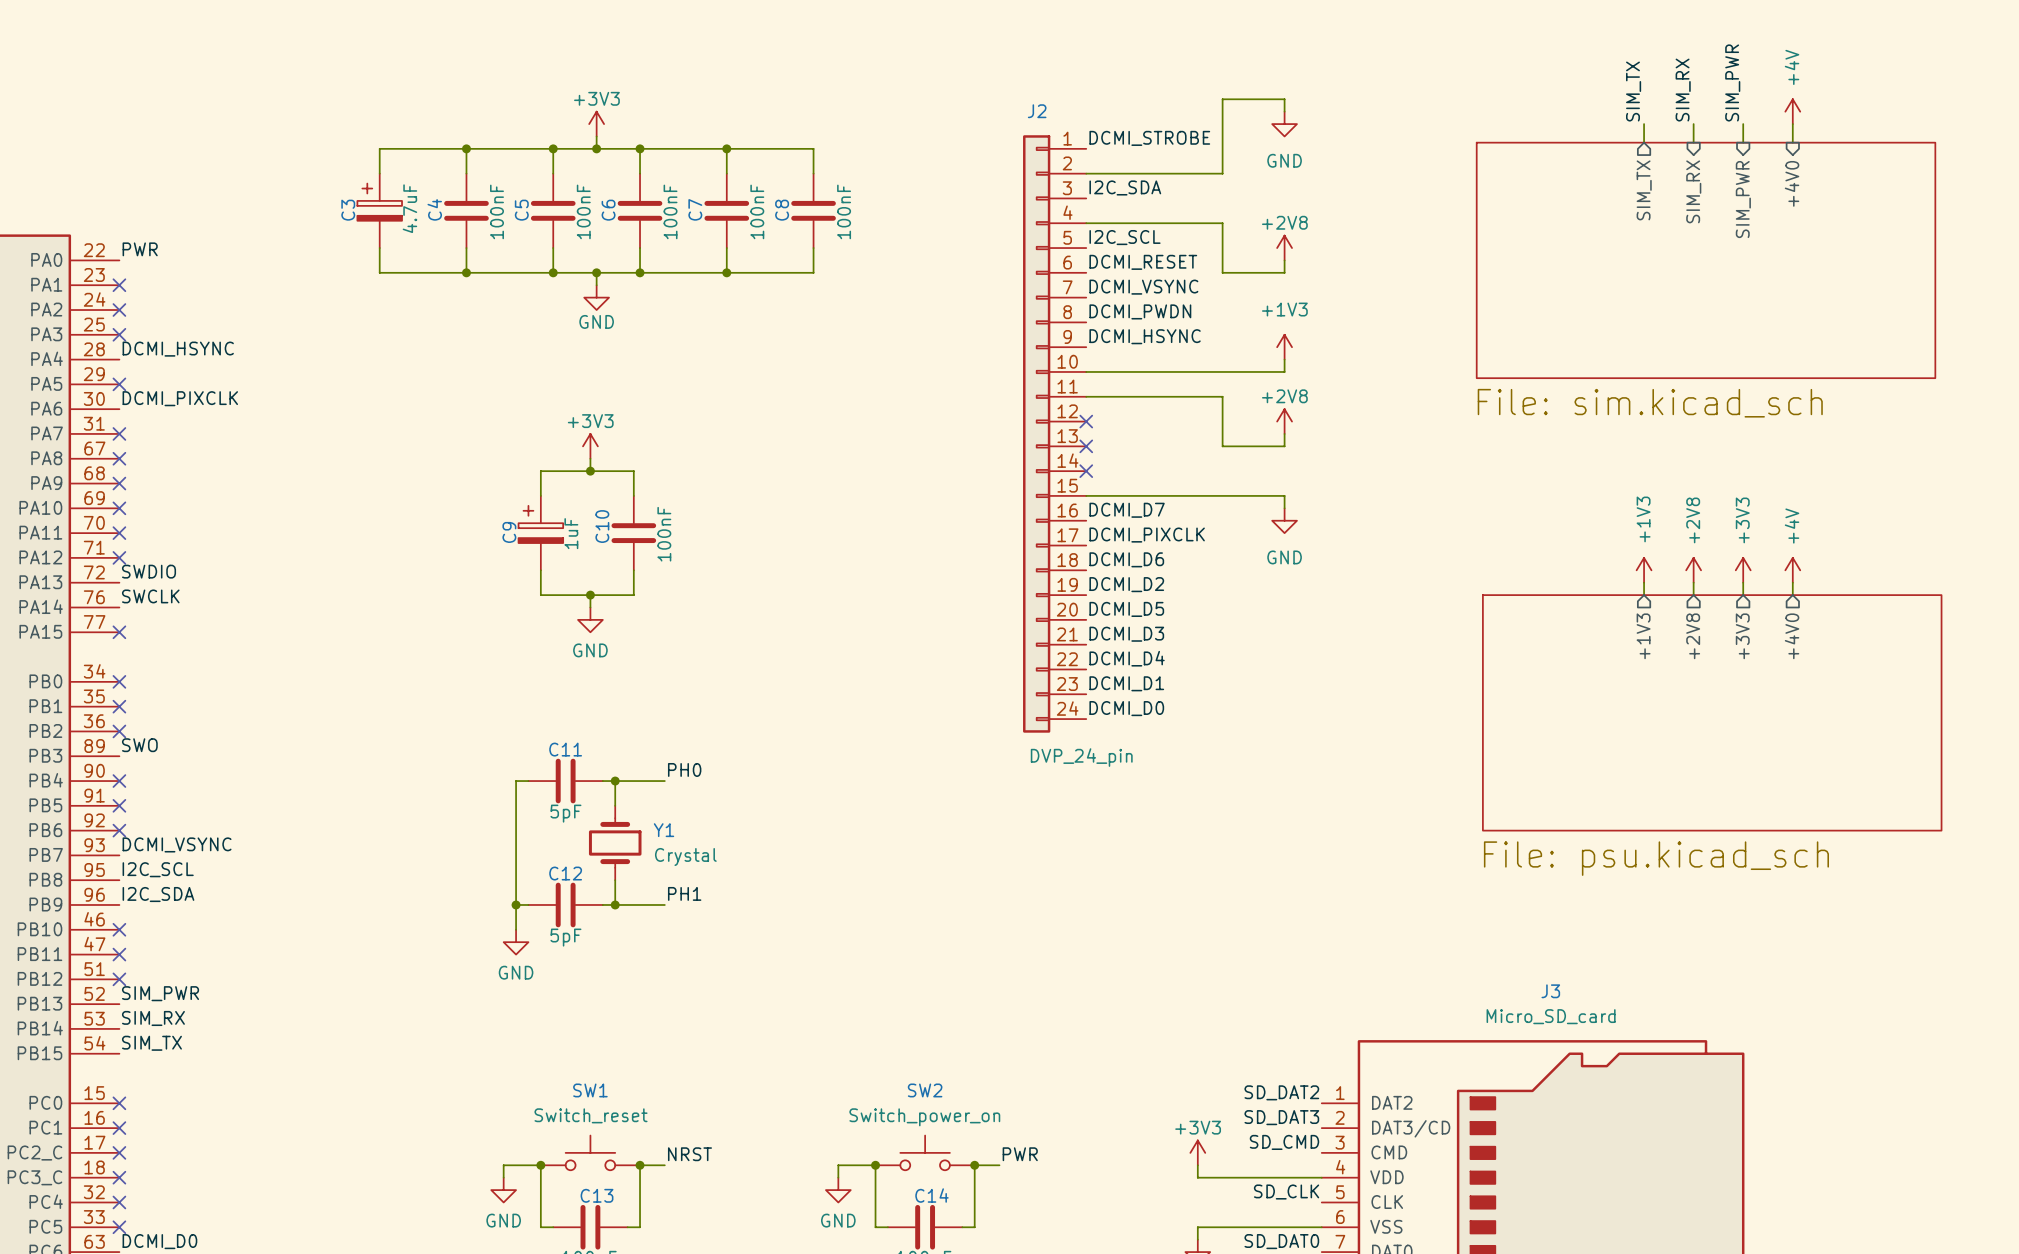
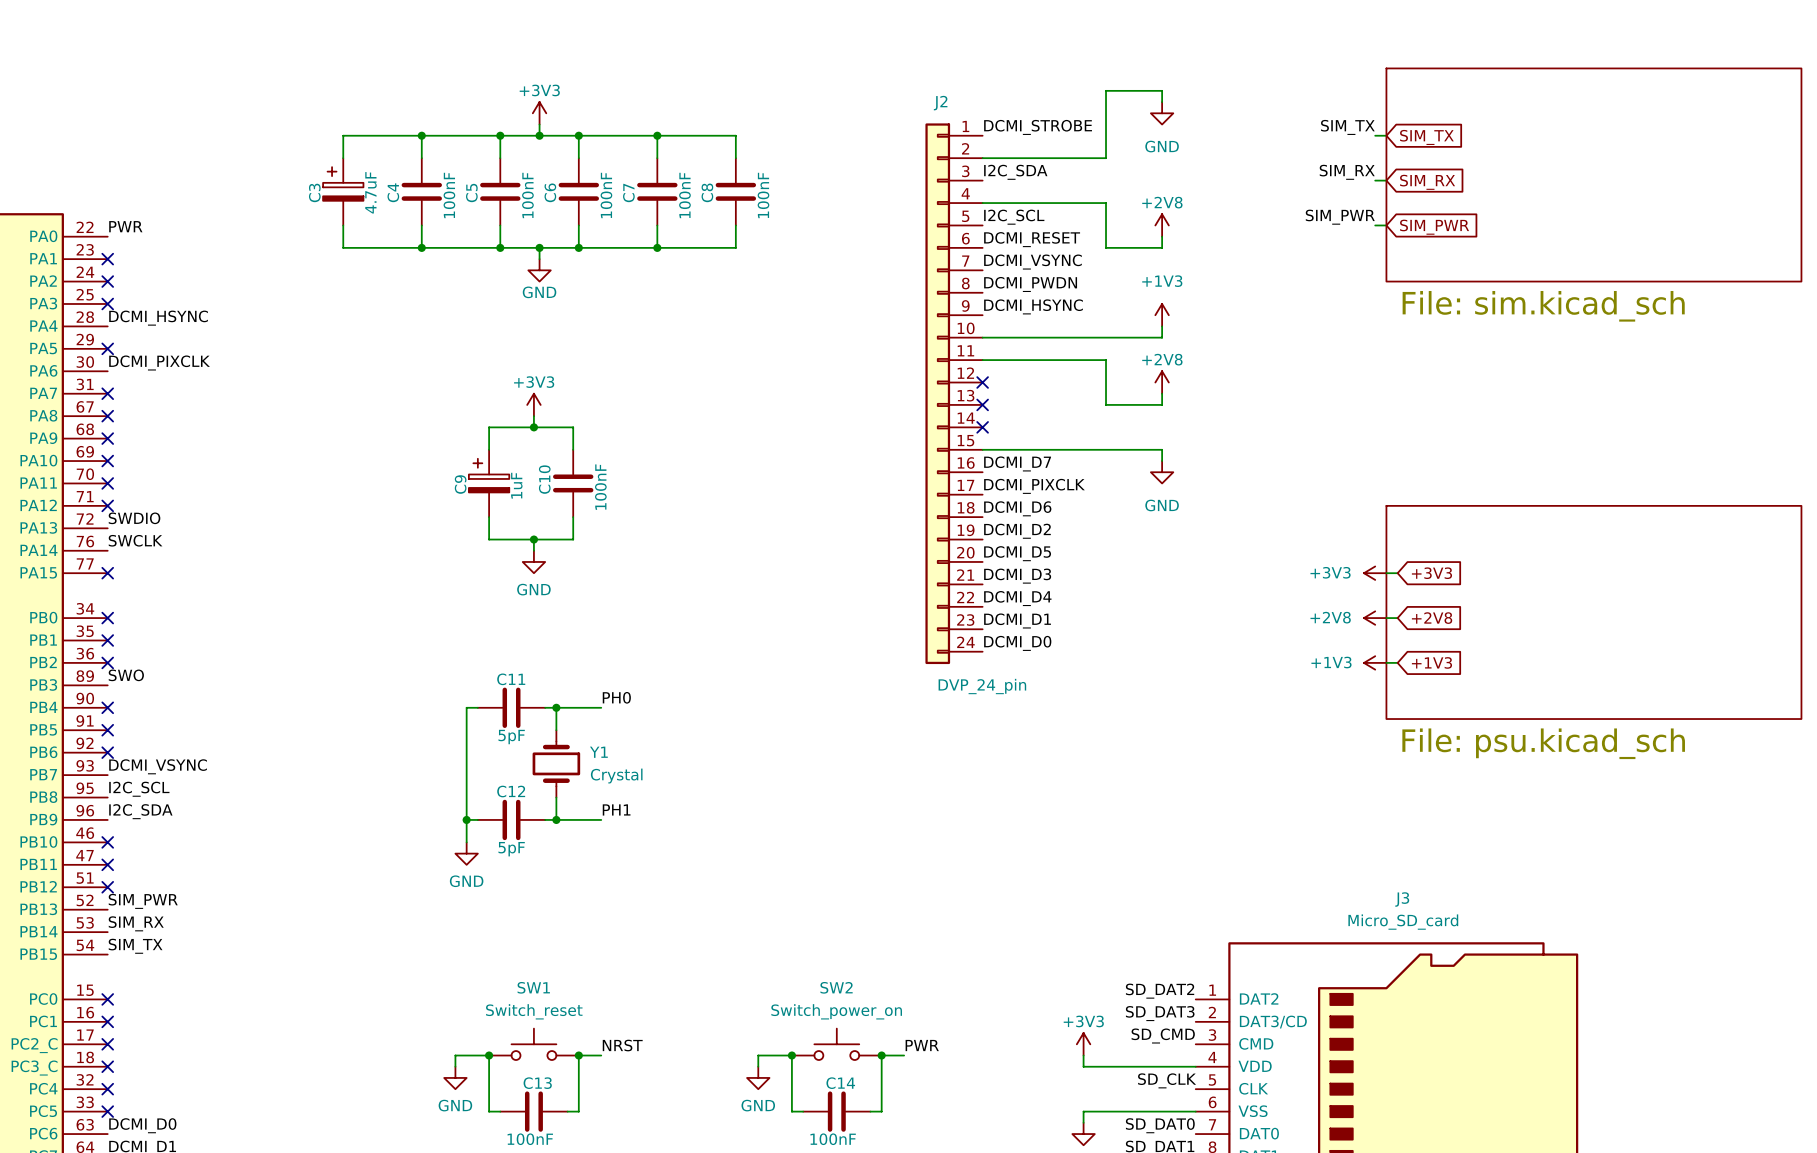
label: SIM_PWR (1732, 82) -> none
label rotation: 0° (1683, 90) -> 90° clockwise (1347, 172)
label position: SIM_RX (1683, 90) -> SIM_RX (1347, 172)
label rotation: 0° (1633, 91) -> 90° clockwise (1347, 127)
label position: SIM_TX (1633, 91) -> SIM_TX (1347, 127)
power symbol: +4V (1792, 111) -> none
wire: (1644, 124) (1644, 142) -> none
wire: (1693, 124) (1693, 142) -> none
wire: (1743, 124) (1743, 142) -> none
wire: (1792, 124) (1792, 142) -> none
wire: none -> (1375, 135) (1386, 135)
global label: none -> SIM_TX (1426, 137)
sheet pin: +4V0 (1792, 183) -> none
sheet pin: SIM_TX (1644, 190) -> none
sheet pin: SIM_RX (1693, 191) -> none
wire: none -> (1375, 180) (1386, 180)
global label: none -> SIM_RX (1427, 182)
sheet pin: SIM_PWR (1743, 199) -> none
label: none -> SIM_PWR (1340, 217)
wire: none -> (1375, 225) (1386, 225)
global label: none -> SIM_PWR (1434, 227)
sheet position: (1706, 260) -> (1593, 174)
power symbol rotation: 0° (1644, 570) -> 90° counterclockwise (1375, 662)
power symbol position: +1V3 (1644, 570) -> +1V3 (1375, 662)
power symbol rotation: 0° (1693, 570) -> 90° counterclockwise (1375, 618)
power symbol position: +2V8 (1693, 570) -> +2V8 (1375, 618)
power symbol rotation: 0° (1743, 570) -> 90° counterclockwise (1375, 573)
power symbol position: +3V3 (1743, 570) -> +3V3 (1375, 573)
power symbol: +4V (1792, 570) -> none
wire: (1644, 582) (1644, 595) -> none
wire: (1693, 582) (1693, 595) -> none
wire: (1743, 582) (1743, 595) -> none
wire: (1792, 582) (1792, 595) -> none
wire: none -> (1386, 573) (1397, 573)
global label: none -> +3V3 (1431, 573)
sheet pin: +1V3 (1643, 636) -> none
sheet pin: +2V8 (1693, 636) -> none
sheet pin: +3V3 (1742, 636) -> none
sheet pin: +4V0 (1792, 636) -> none
wire: none -> (1386, 618) (1397, 618)
global label: none -> +2V8 (1432, 618)
sheet position: (1712, 712) -> (1593, 612)
wire: none -> (1386, 662) (1397, 662)
global label: none -> +1V3 (1431, 662)

